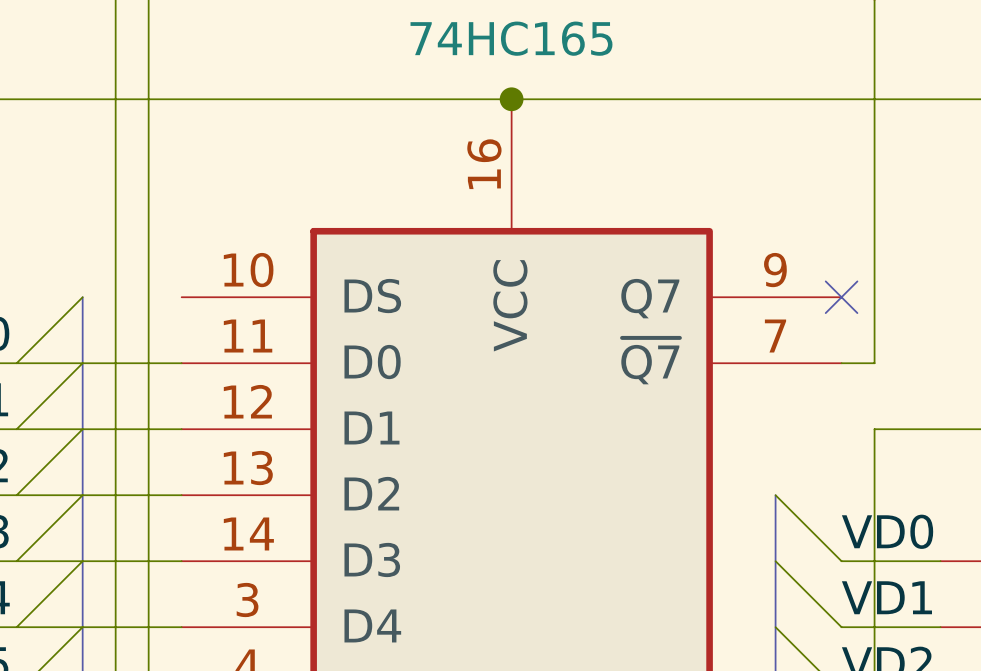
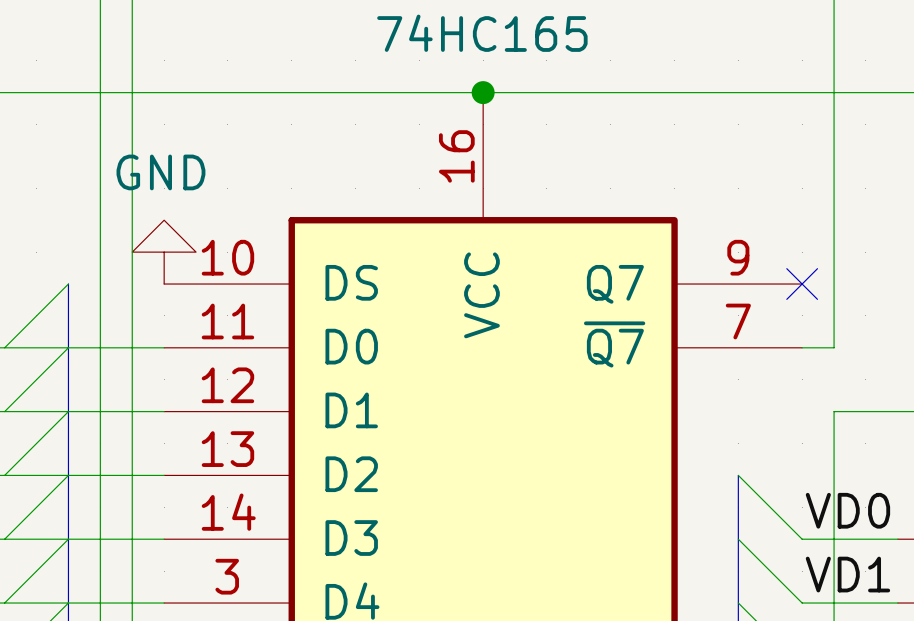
power symbol: none -> GND (164, 252)

